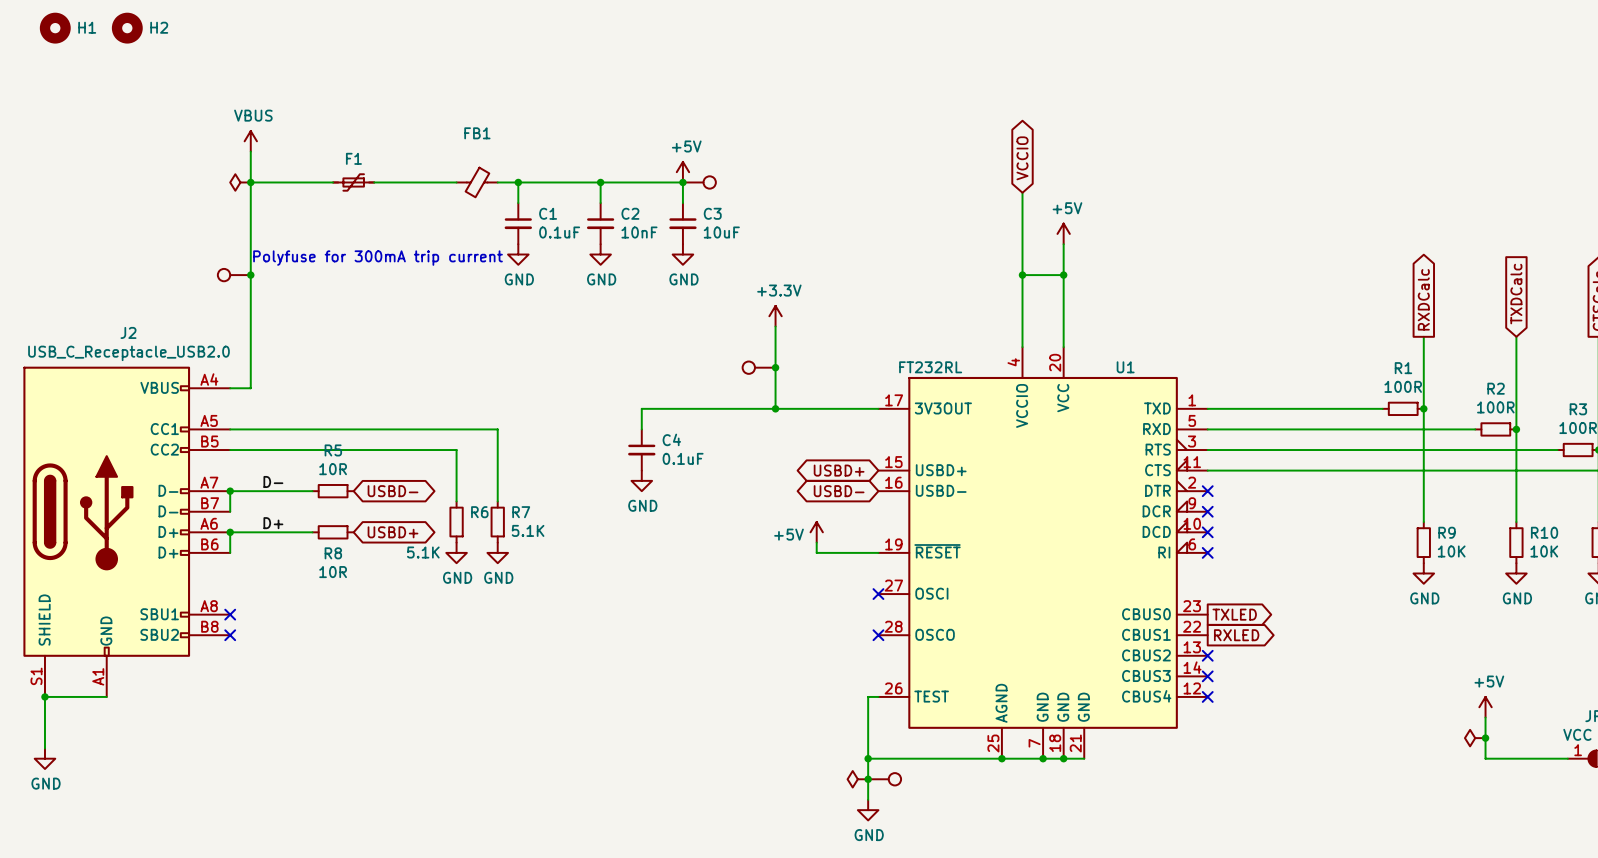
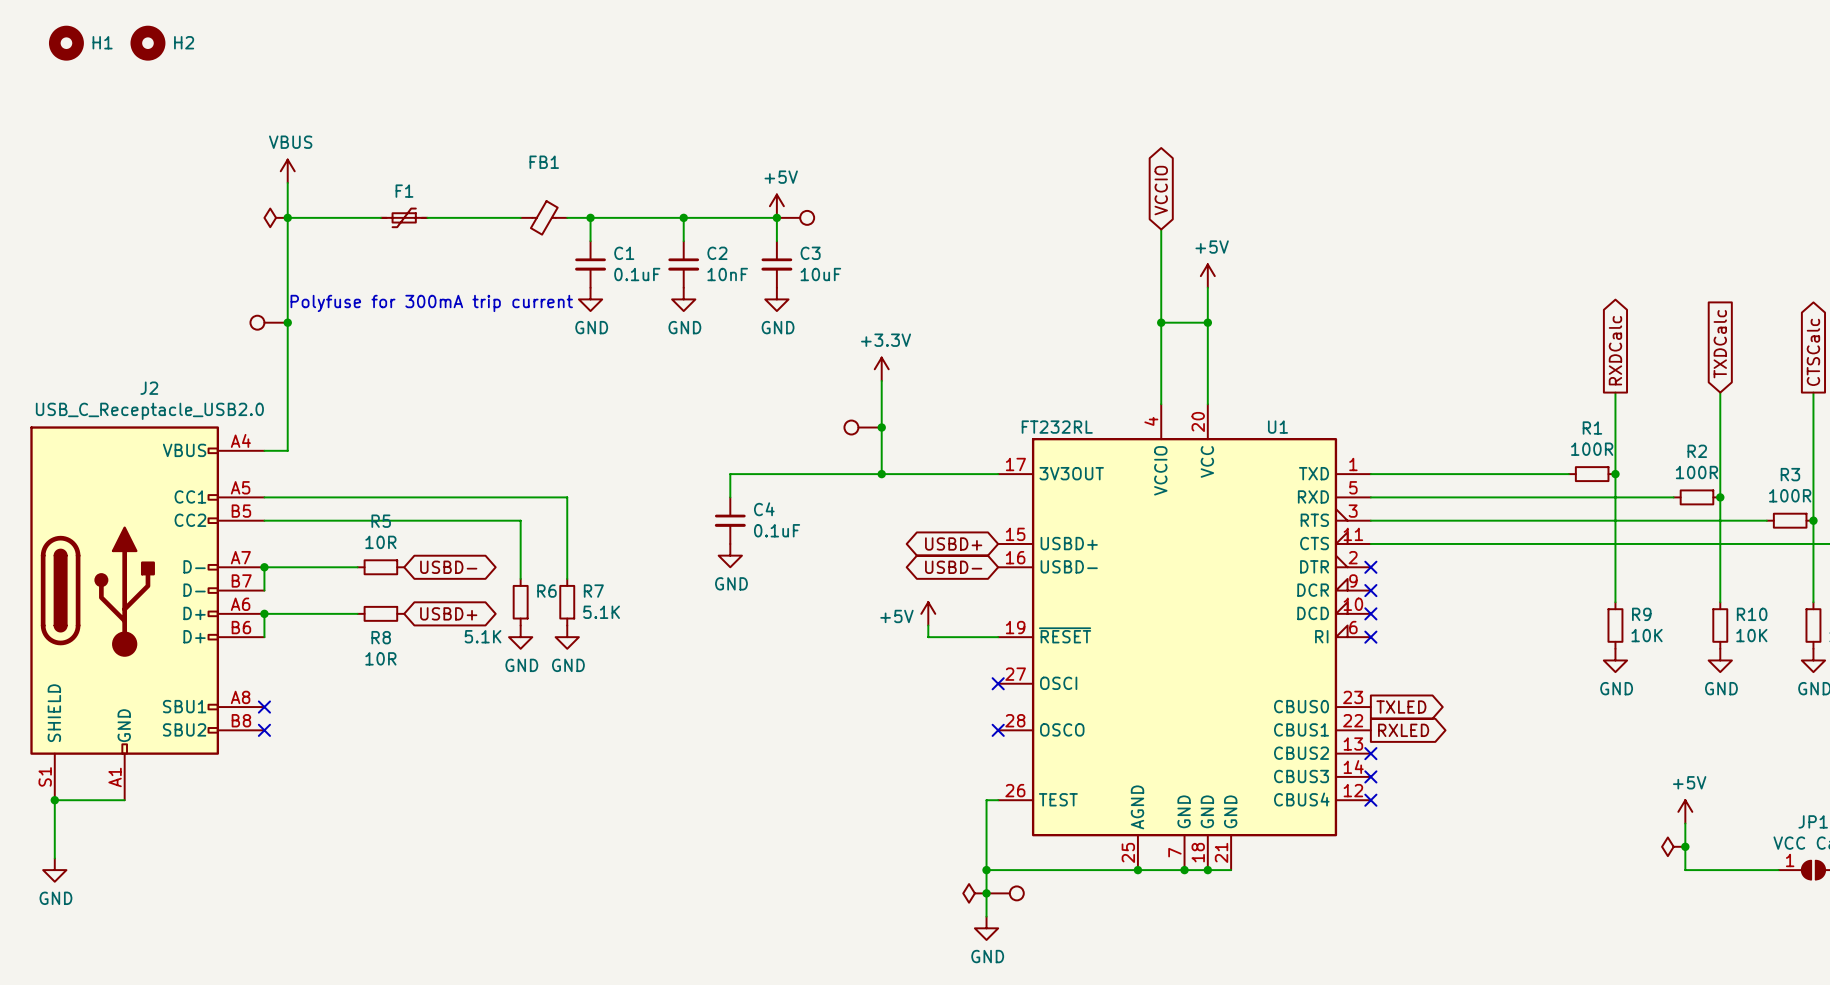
label: D- (273, 481) -> none
label: D+ (273, 523) -> none

